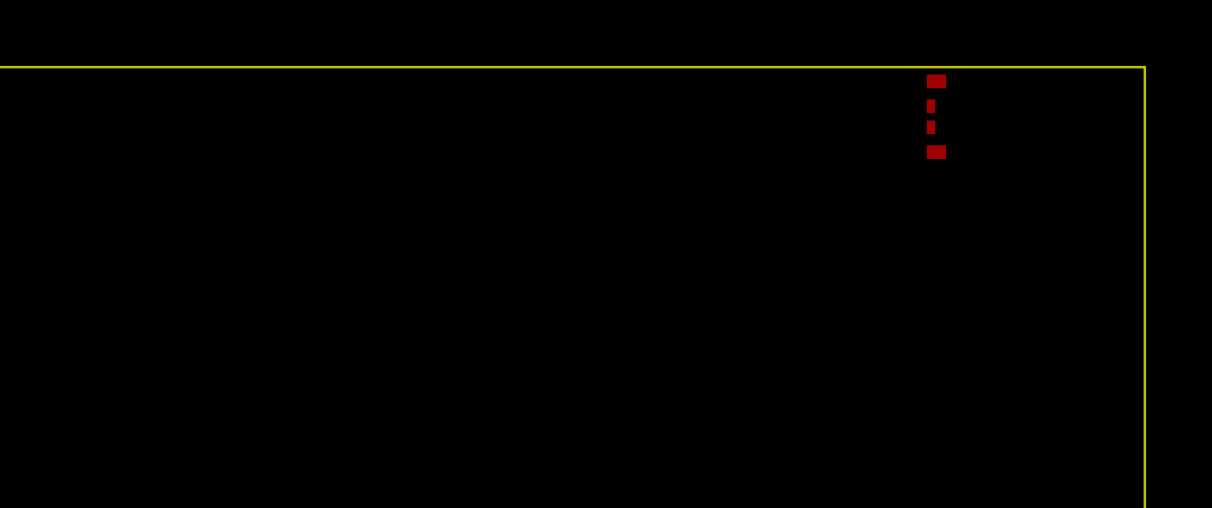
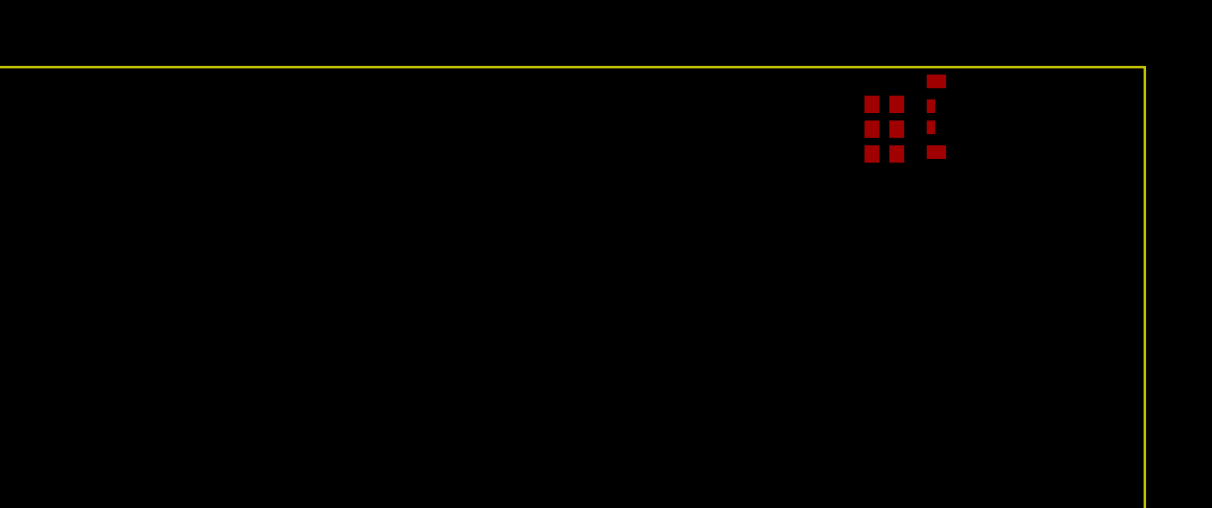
part: none -> (884, 104)
part: none -> (884, 129)
part: none -> (884, 153)

